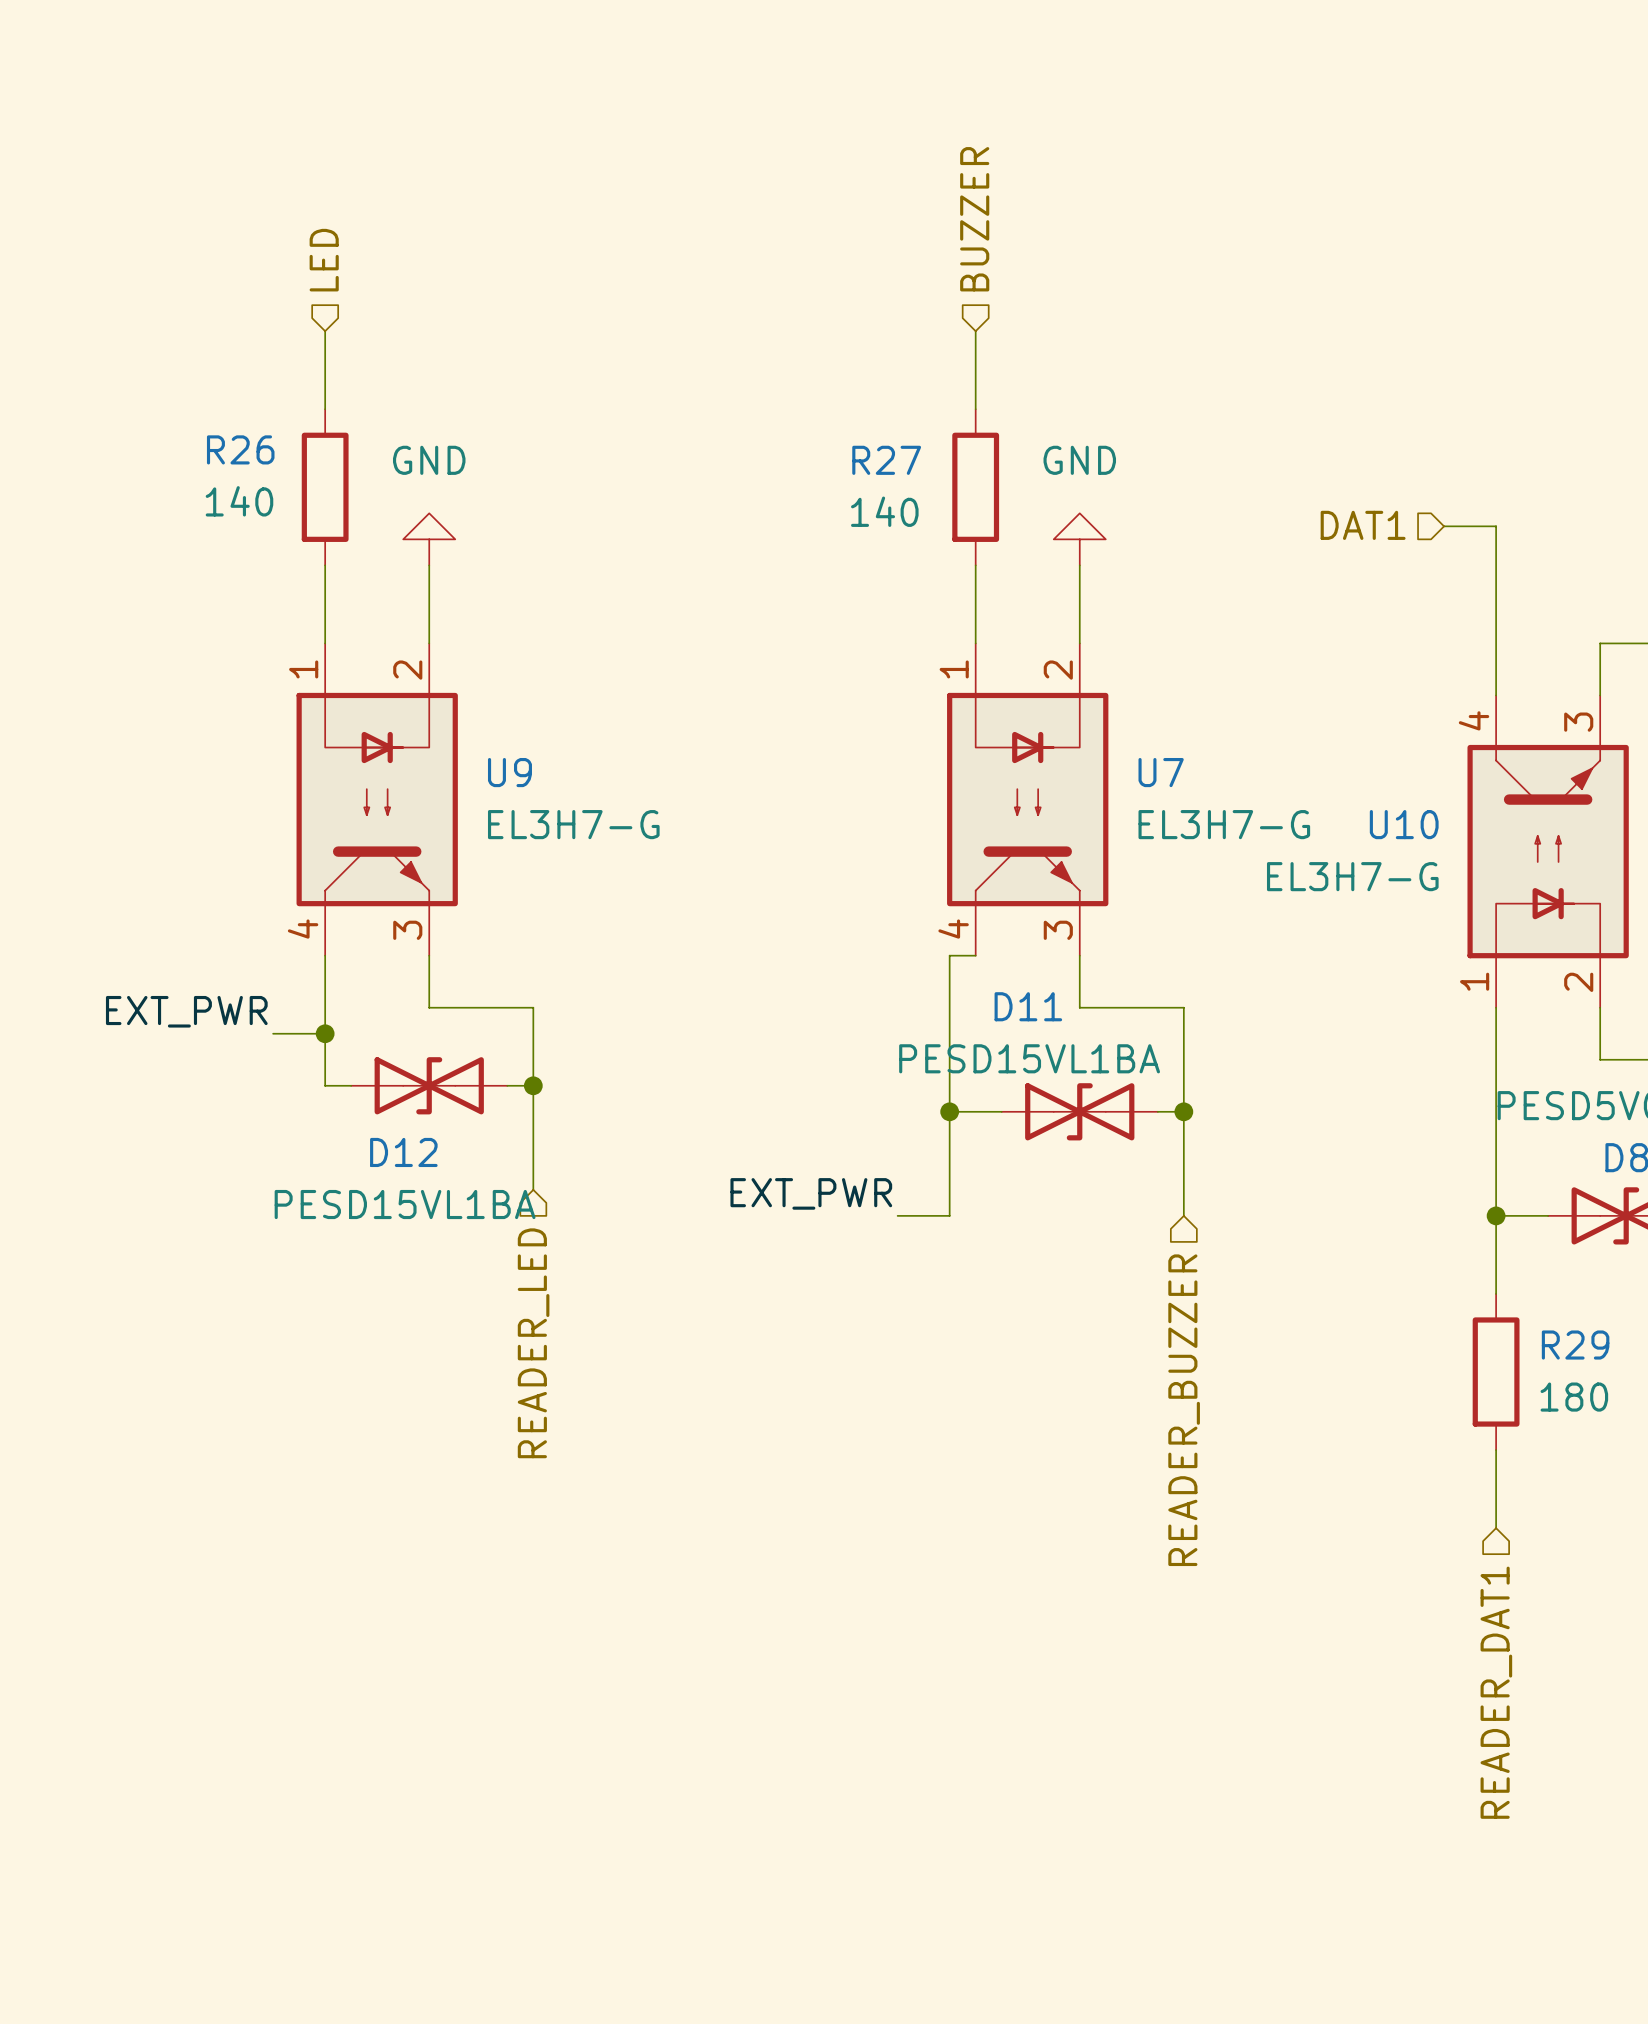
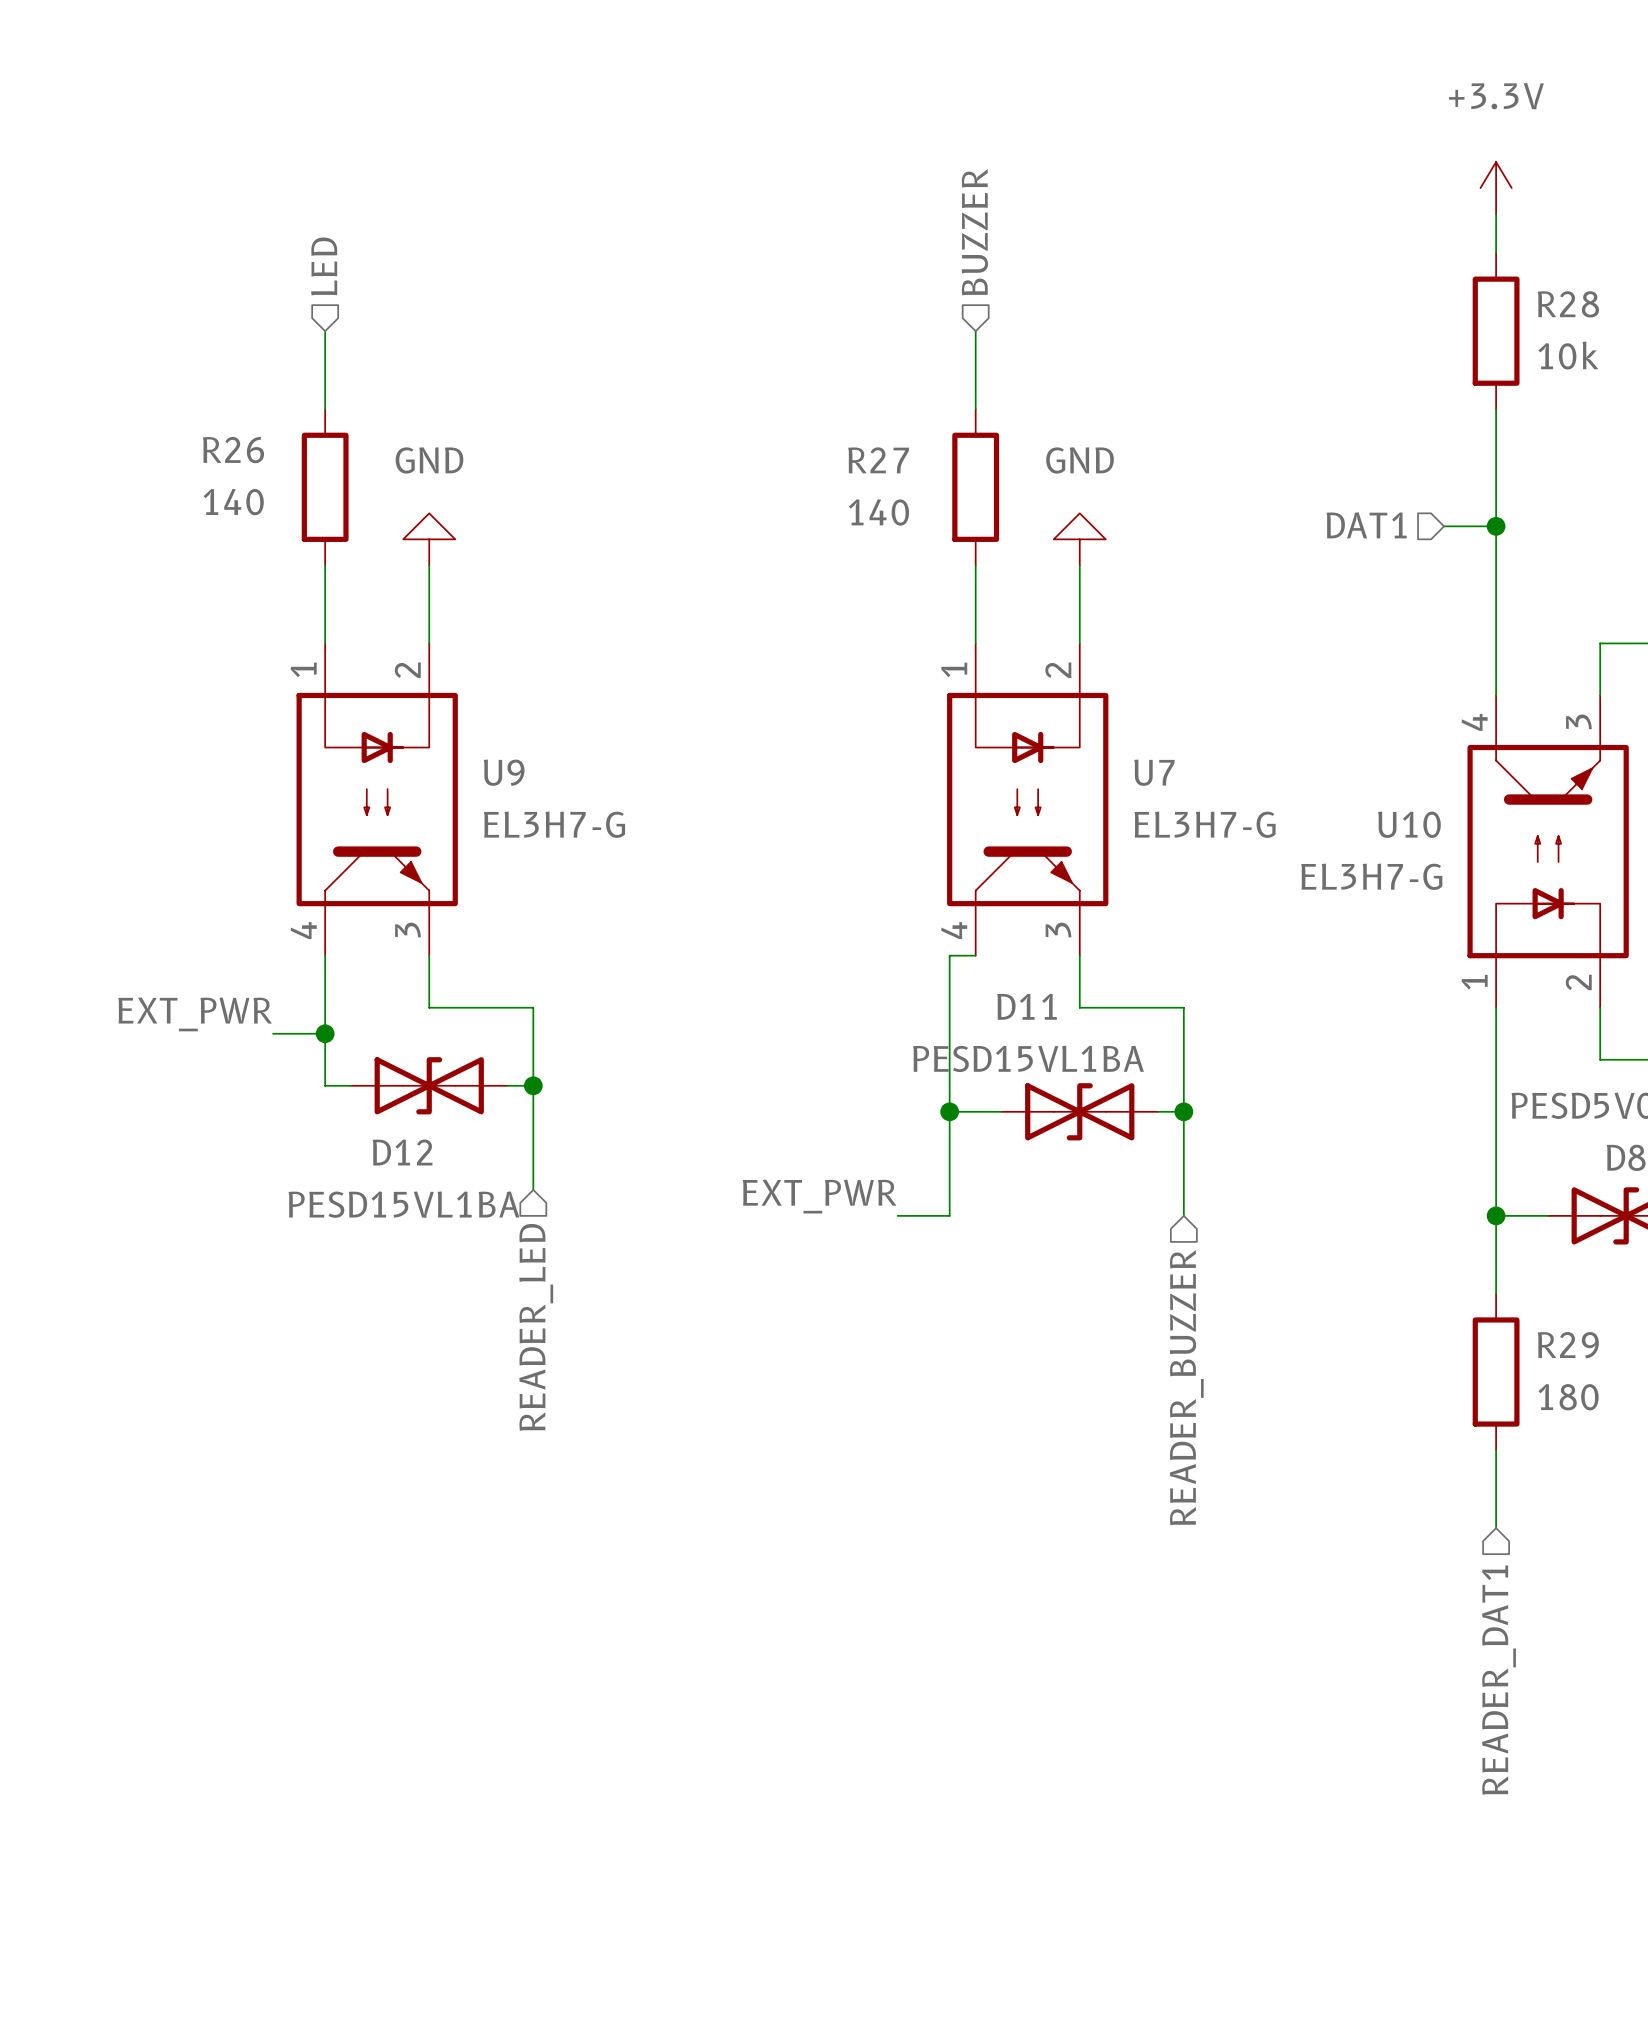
power symbol: none -> +3.3V (1496, 188)
wire: none -> (1496, 214) (1496, 253)
R28: none -> 10k (1496, 331)
wire: none -> (1496, 409) (1496, 526)
junction: none -> (1496, 526)

